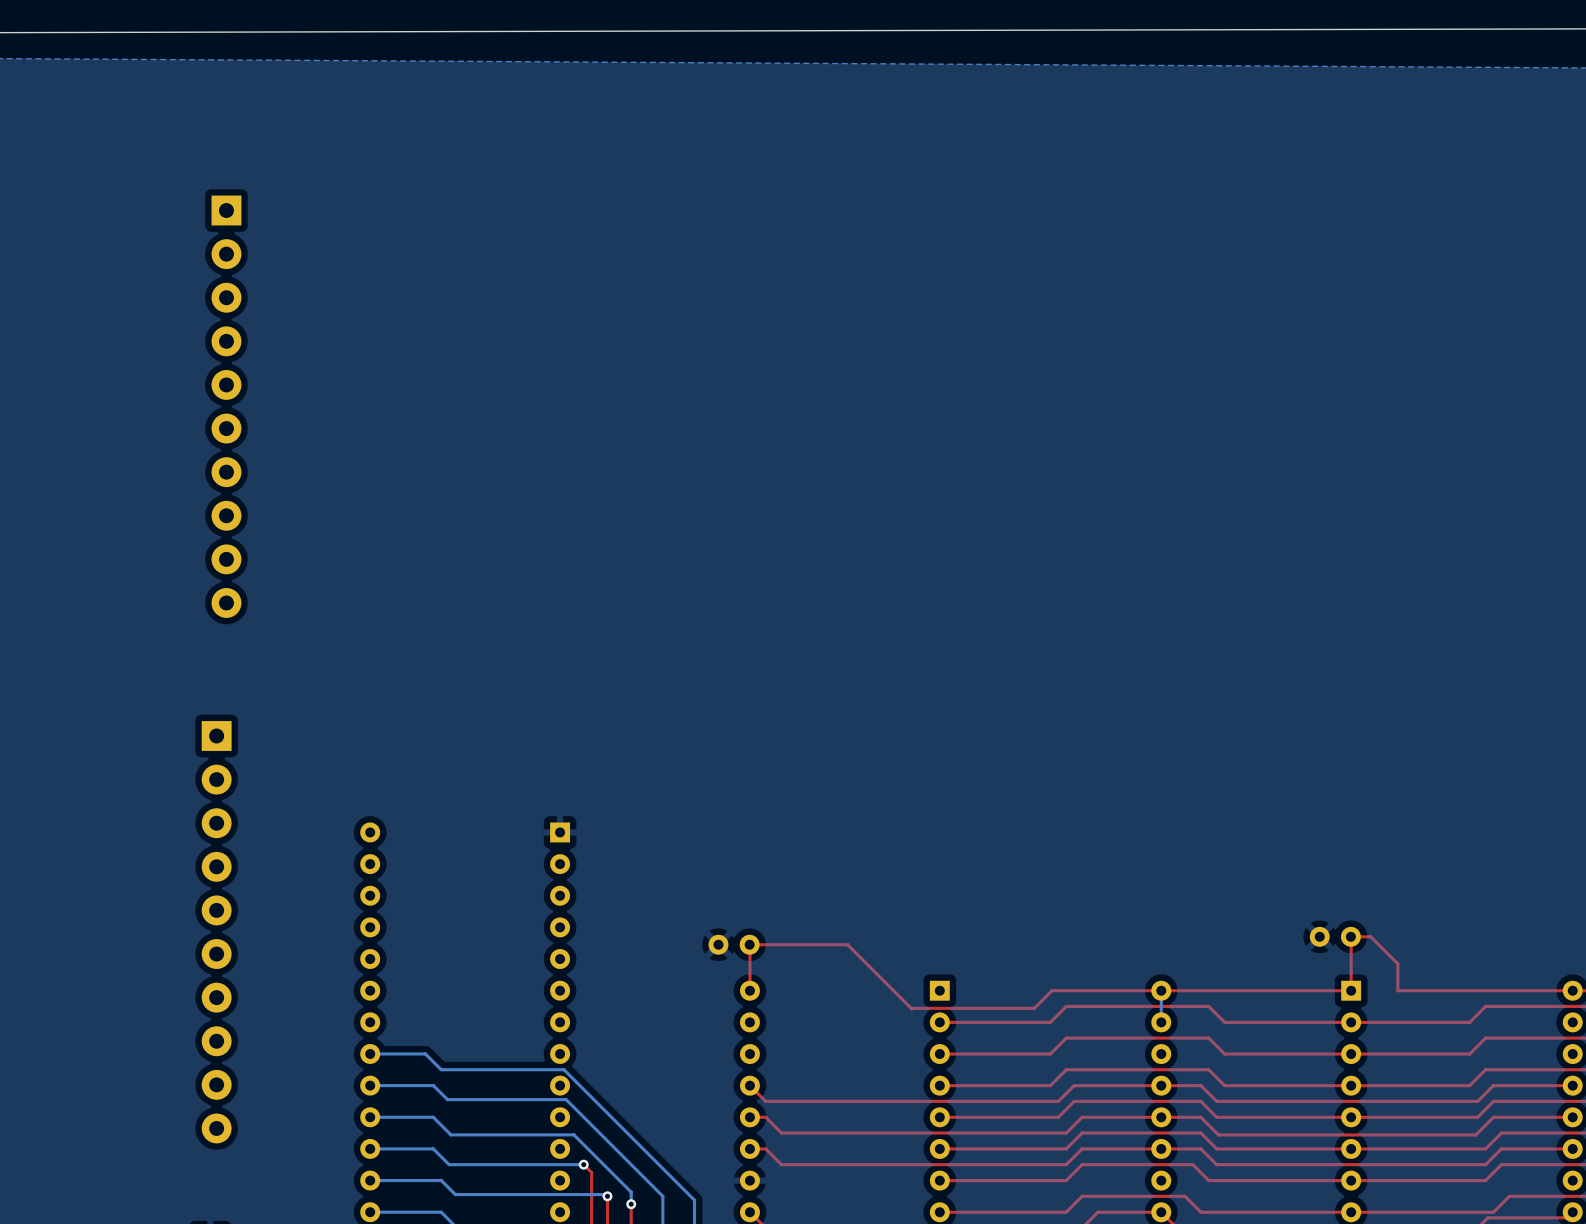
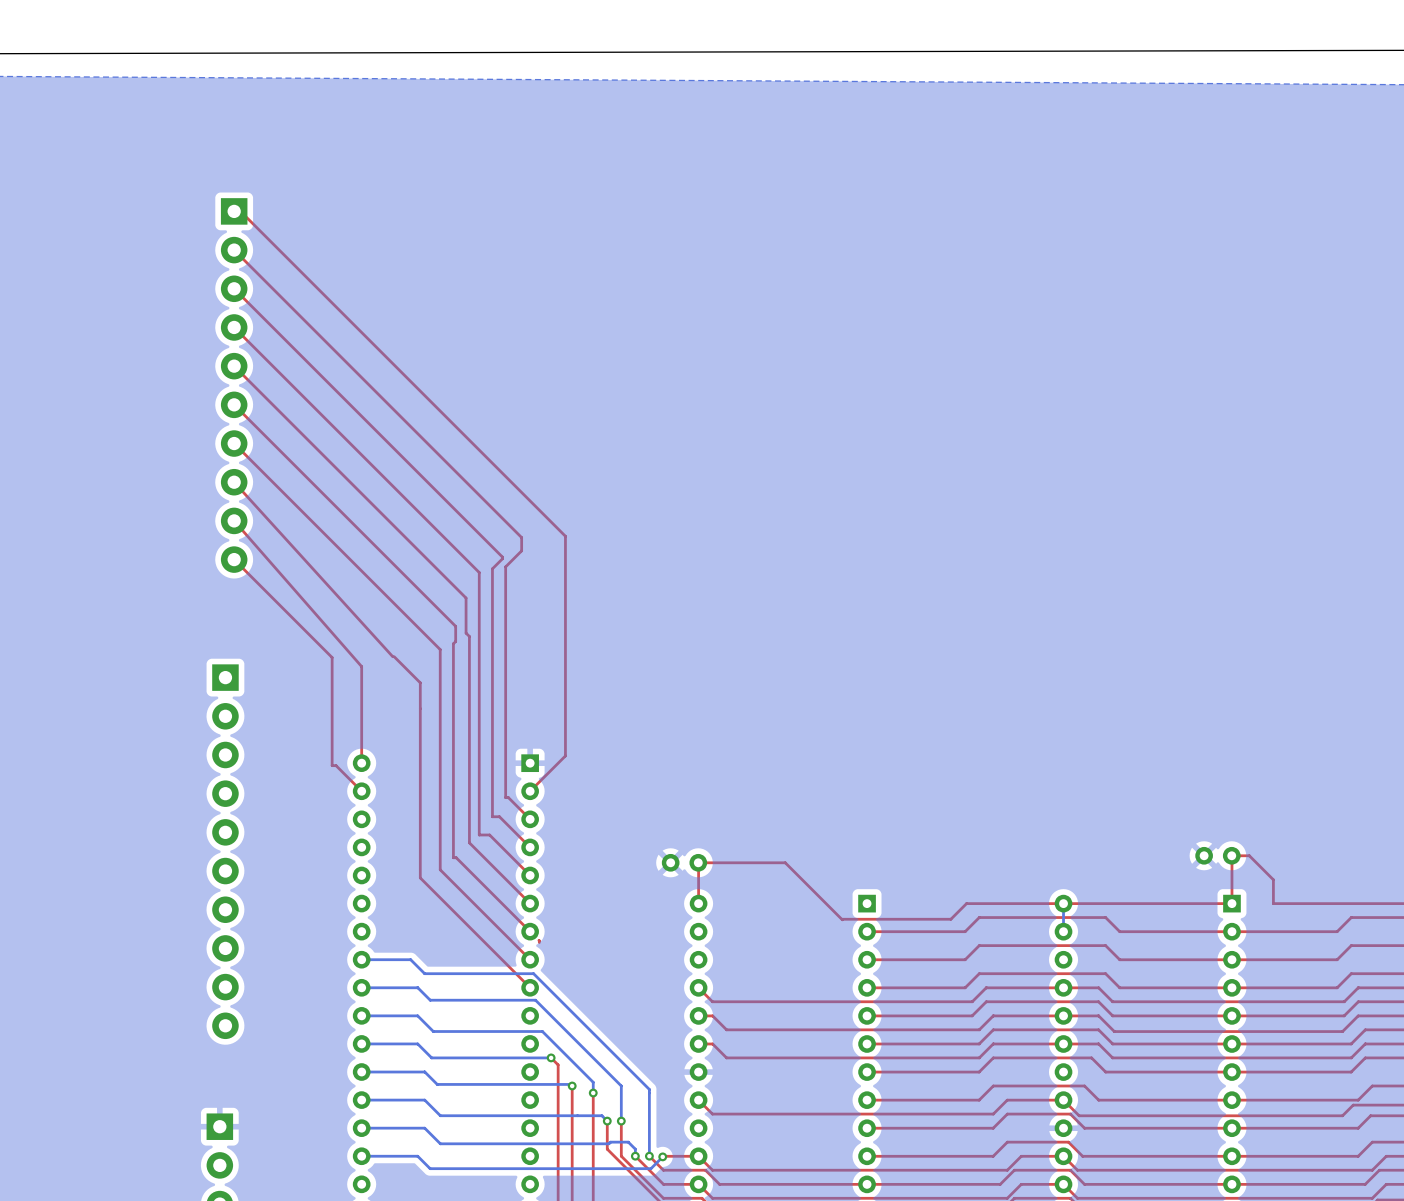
top track: none -> (234, 211) (240, 211) (565, 536) (565, 755) (530, 791)
top track: none -> (234, 250) (521, 537) (521, 550) (505, 566) (505, 797) (508, 797) (530, 819)
top track: none -> (234, 288) (502, 557) (492, 568) (492, 816) (499, 816) (530, 847)
top track: none -> (234, 327) (479, 572) (479, 834) (489, 834) (530, 875)
top track: none -> (234, 366) (466, 598) (466, 633) (469, 636) (469, 842) (530, 903)
top track: none -> (234, 404) (455, 626) (455, 641) (453, 643) (453, 857) (456, 857) (530, 931)
top track: none -> (234, 443) (440, 649) (440, 869) (530, 959)
top track: none -> (234, 482) (392, 656)
top track: none -> (234, 520) (361, 666) (361, 763)
top track: none -> (234, 559) (332, 657) (332, 765) (336, 765) (361, 791)
top track: none -> (394, 656) (420, 682) (420, 877) (530, 987)
top track: none -> (538, 940) (539, 942)

